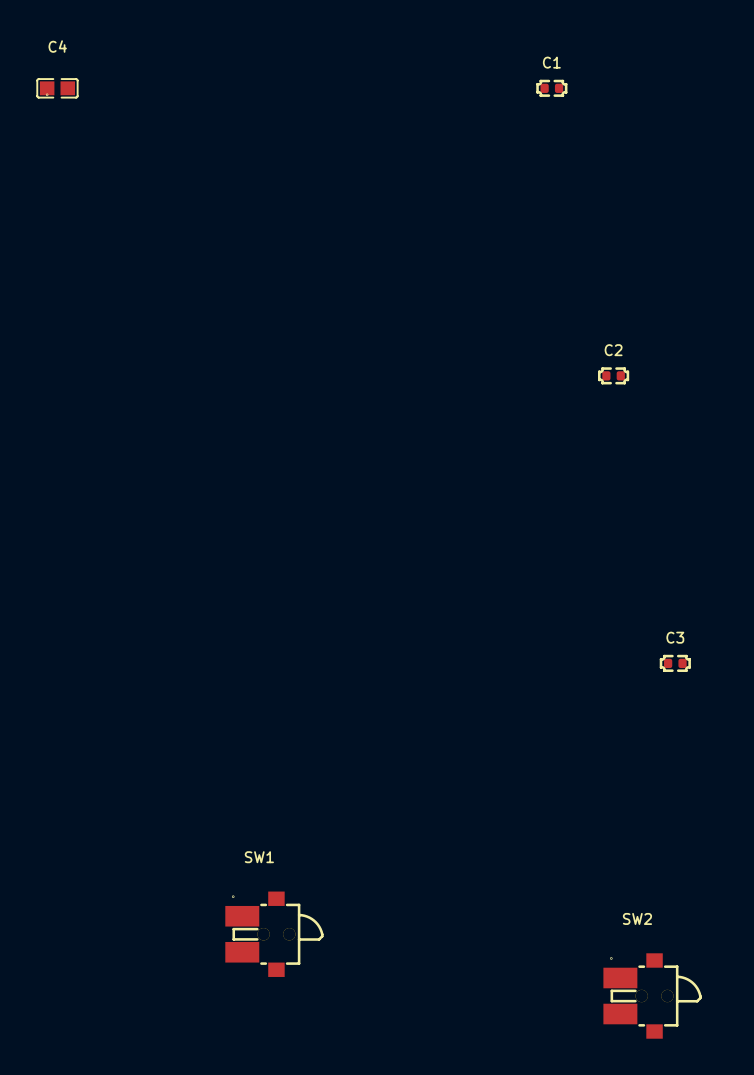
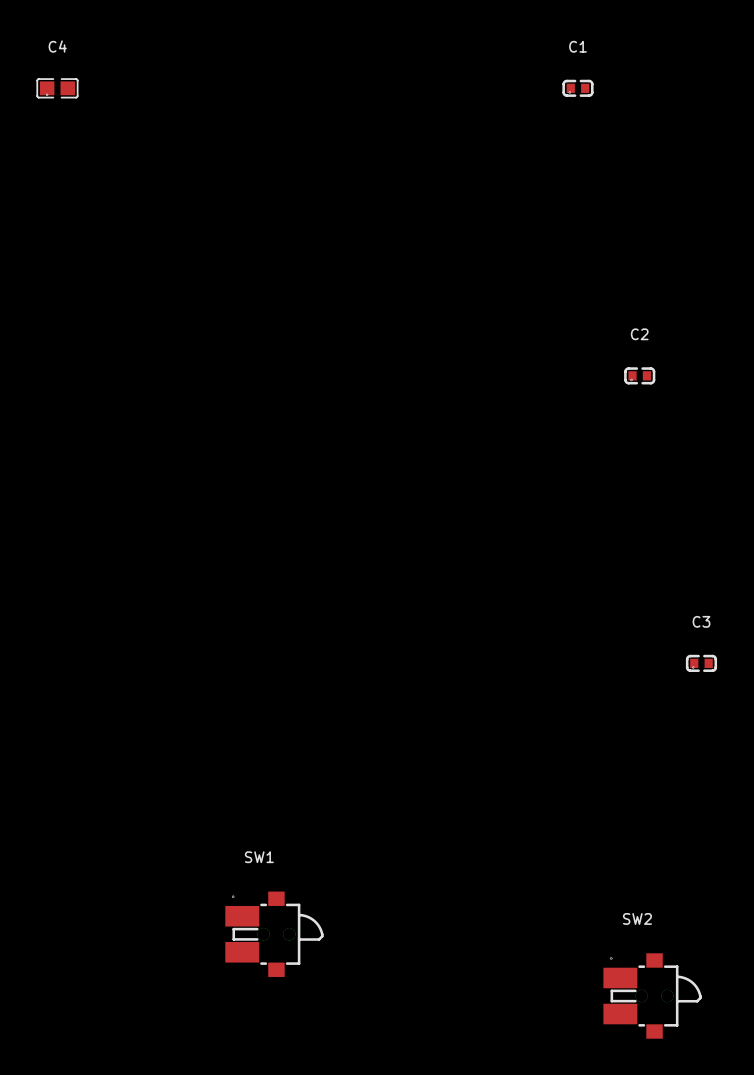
C1 footprint: [536, 79, 568, 97] -> [562, 79, 594, 97]
C2 footprint: [597, 367, 630, 385] -> [624, 367, 656, 385]
C3 footprint: [659, 654, 691, 672] -> [685, 654, 718, 672]

